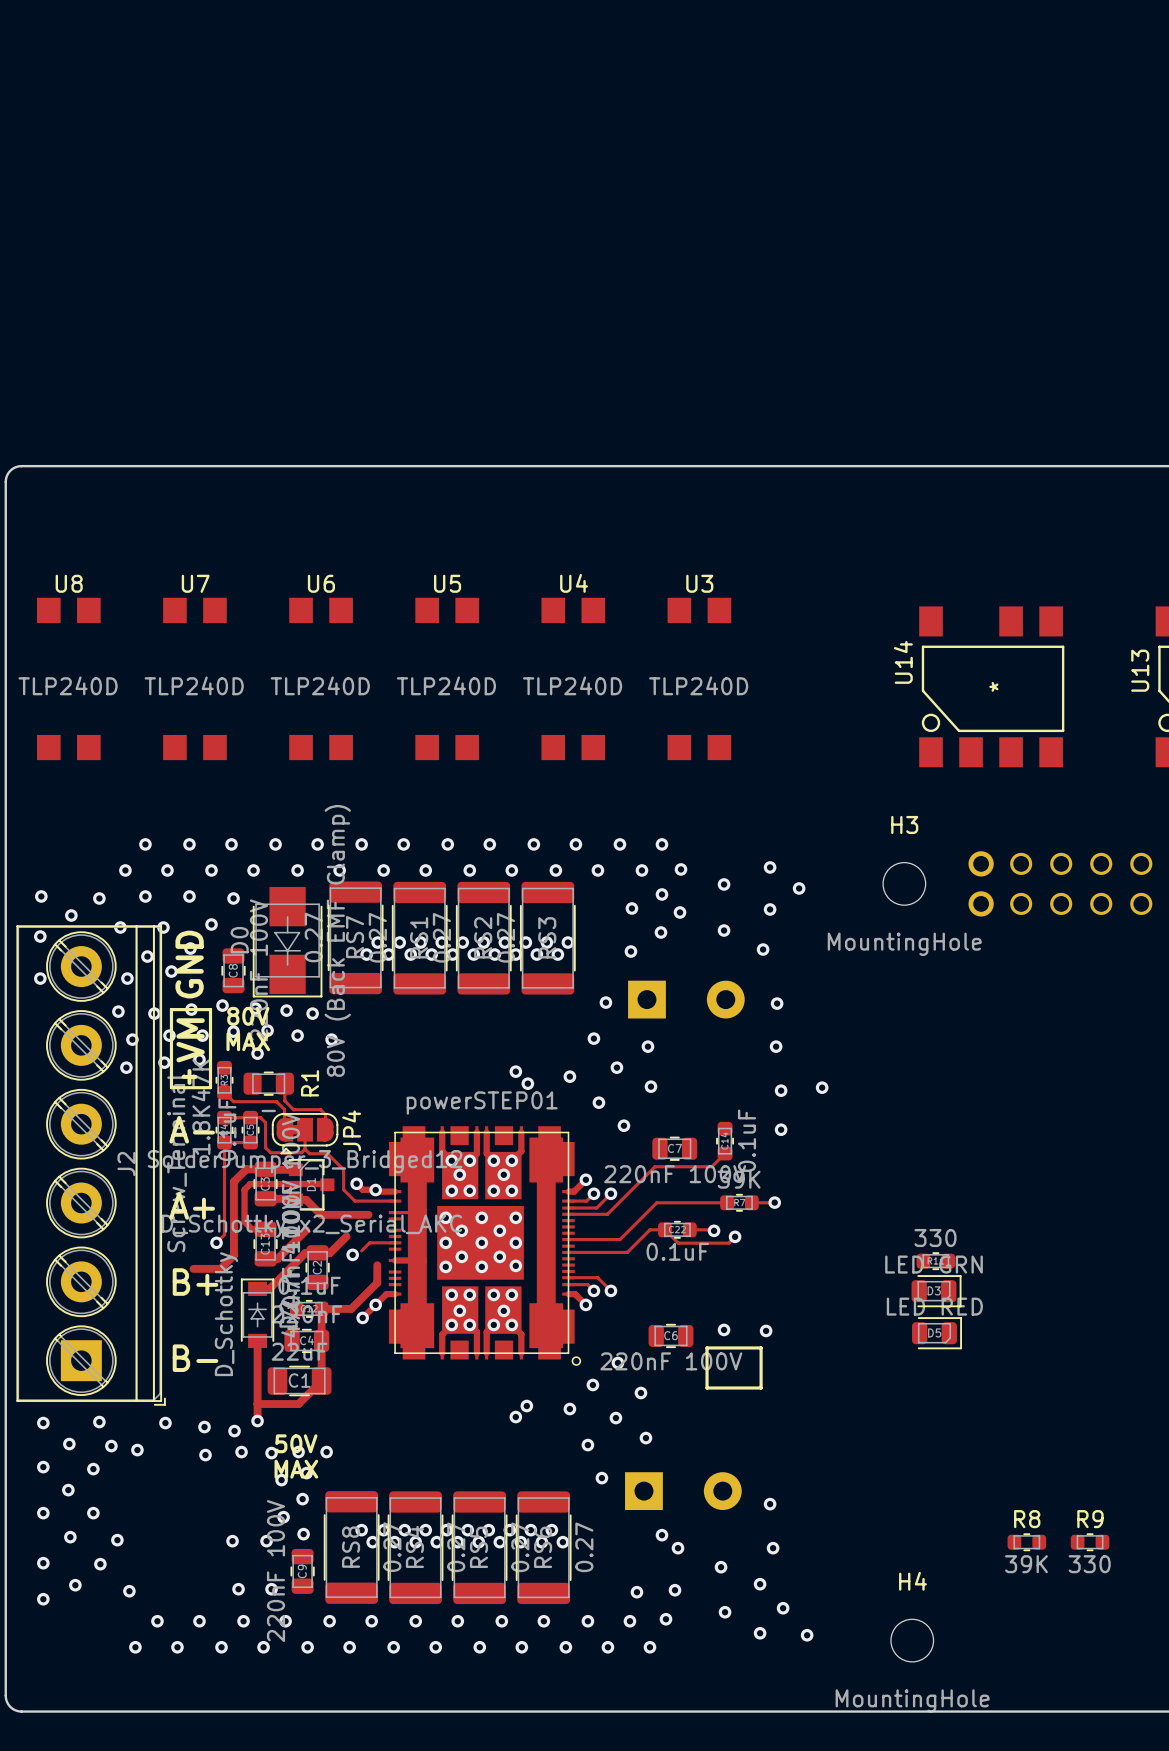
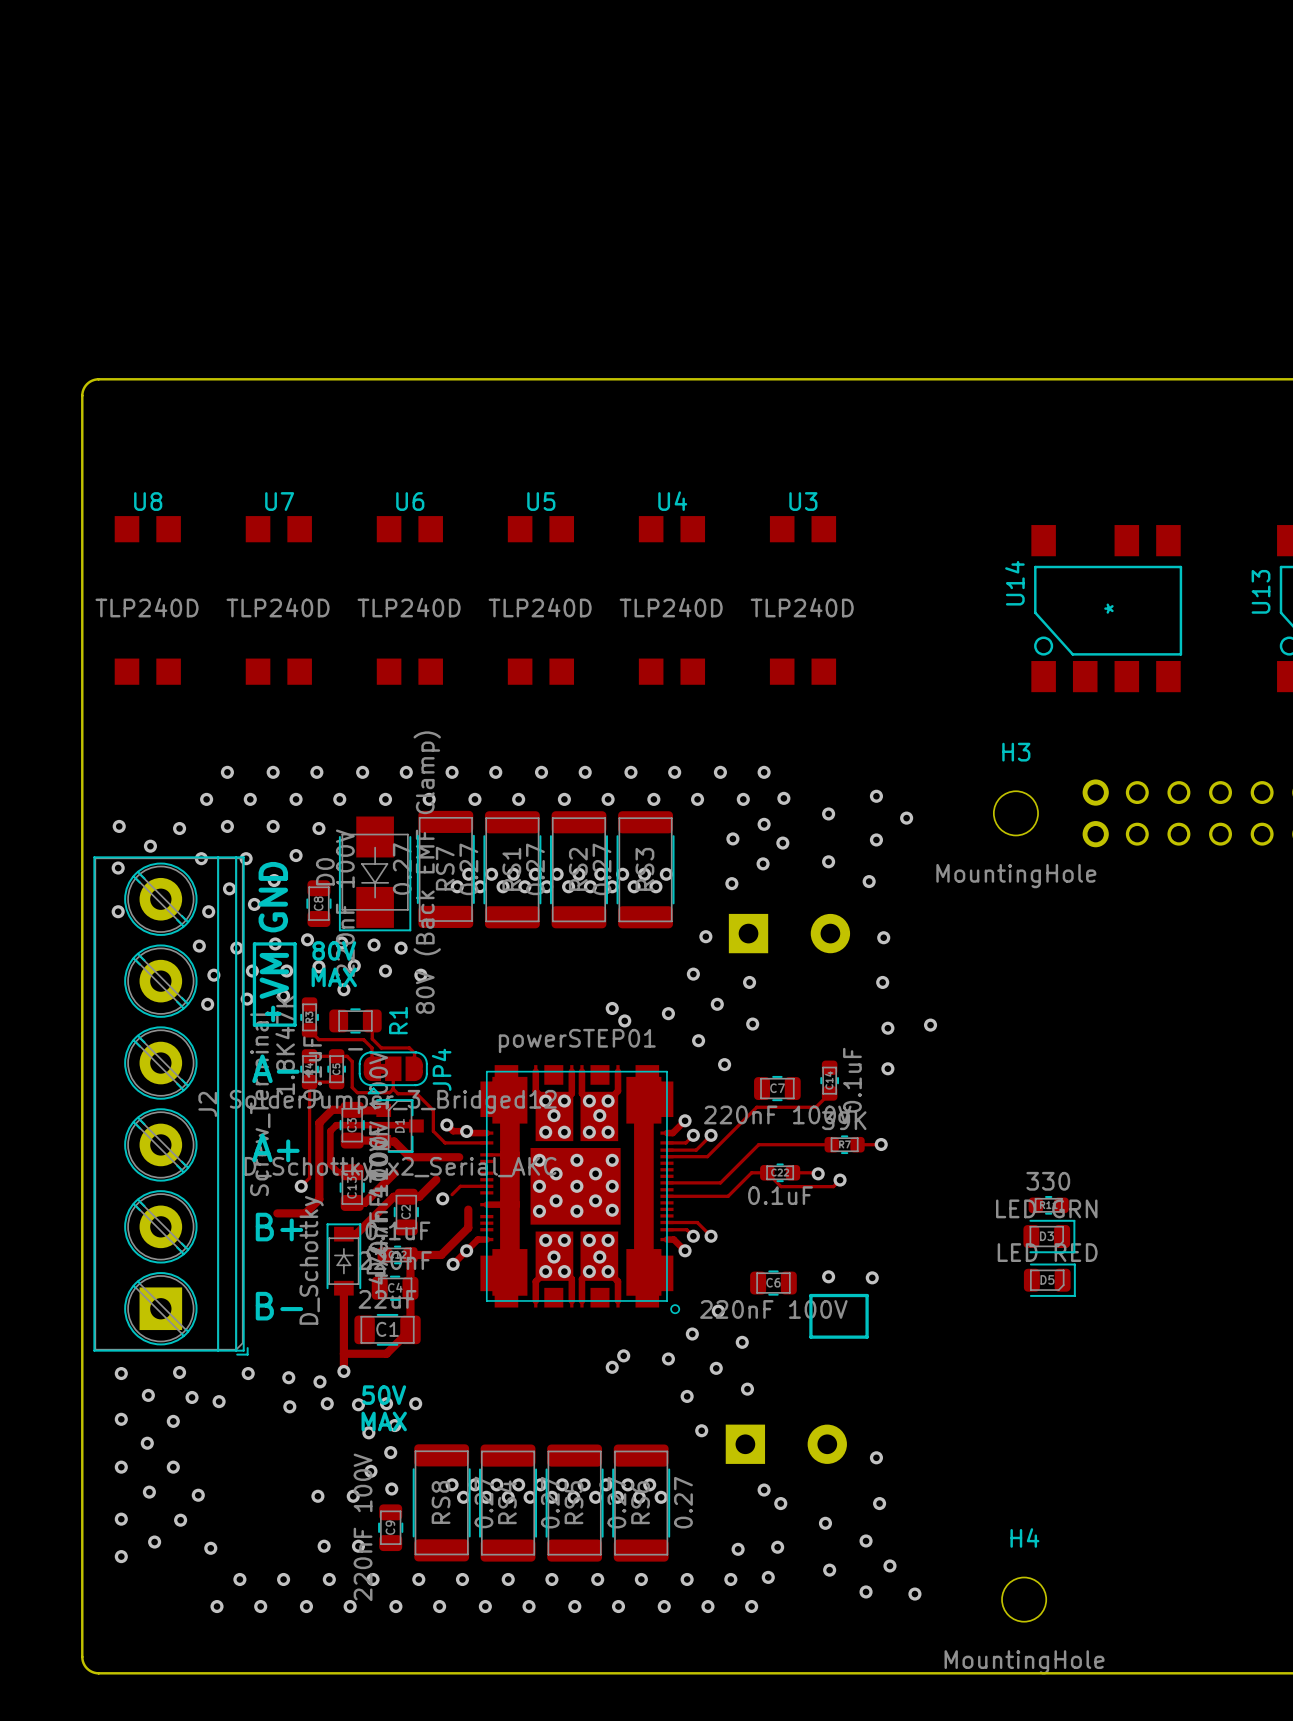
R8: 39K (1026, 1542) -> none
R9: 330 (1090, 1542) -> none

